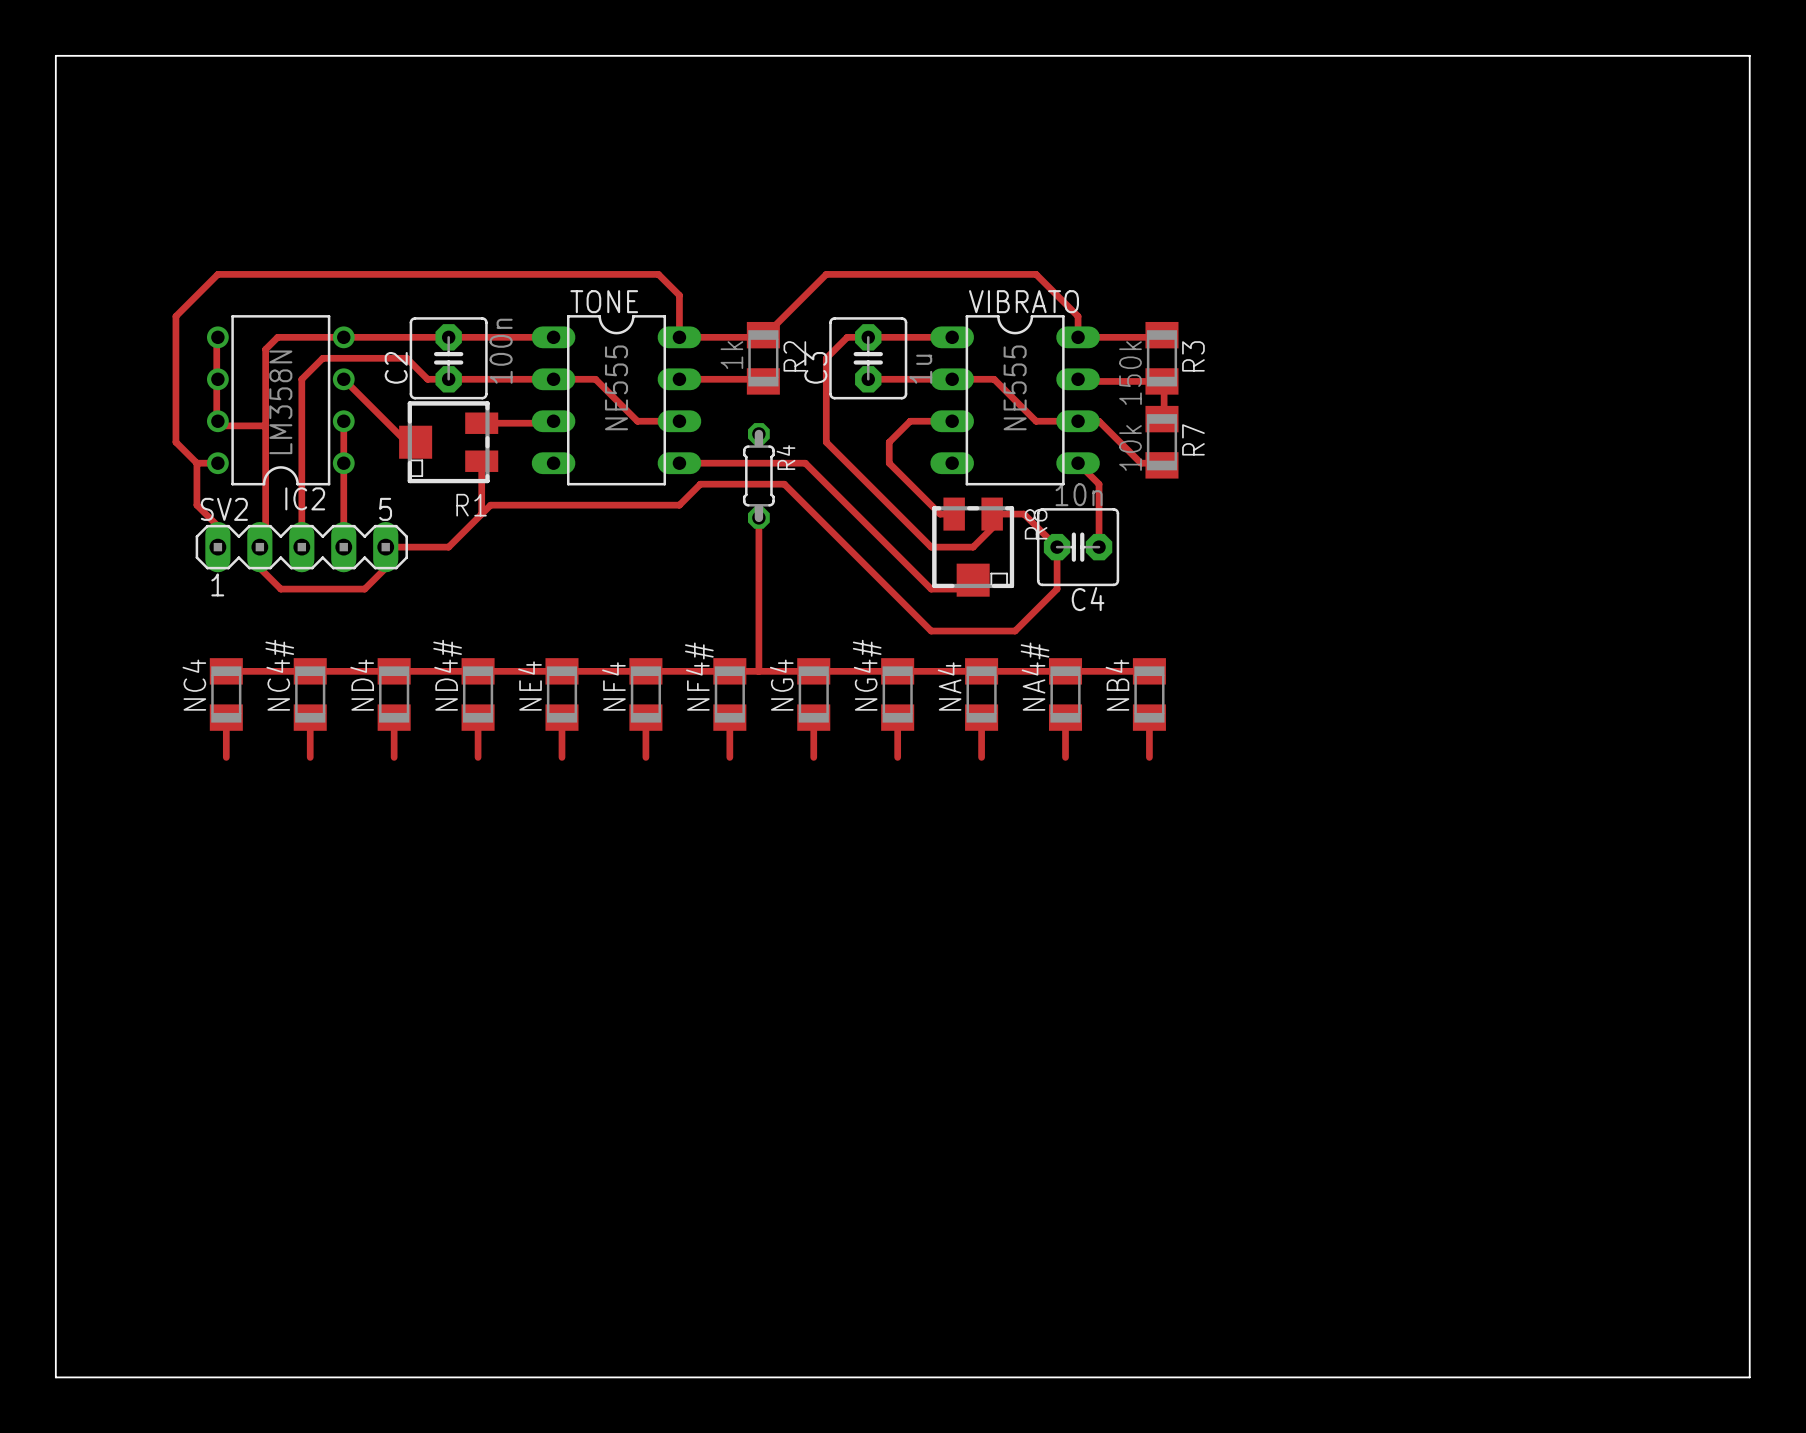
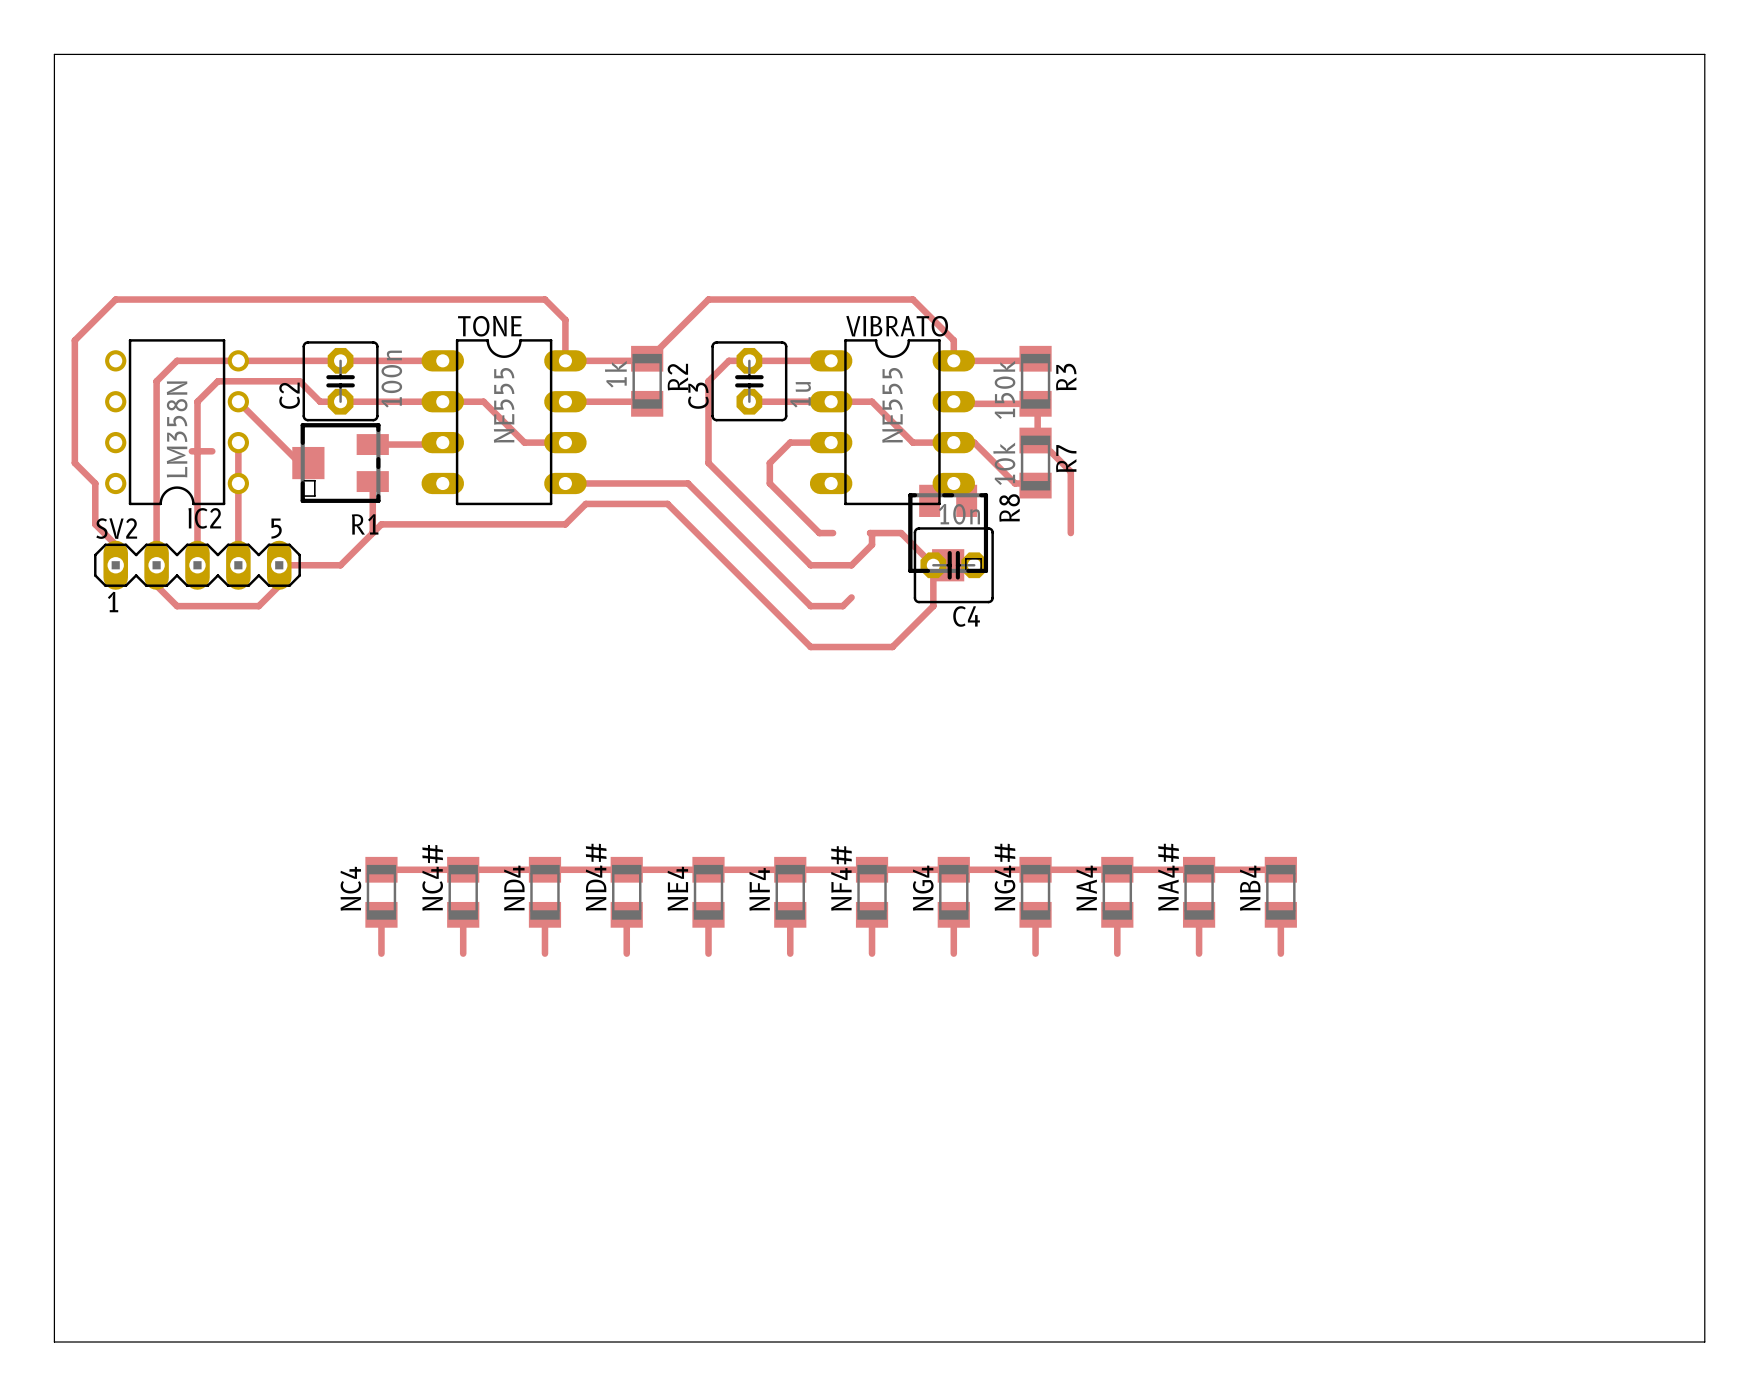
top track: (1161, 335) (1159, 337) (1078, 337) (1078, 316) (1036, 274) (826, 274) (763, 337) -> (1035, 358) (1033, 360) (953, 360) (953, 340) (912, 299) (708, 299) (647, 360)
top track: (553, 337) (277, 337) (265, 349) (265, 559) -> none
top track: (763, 337) (679, 337) (679, 295) (658, 274) (217, 274) (175, 316) (175, 442) (196, 463) (196, 505) (217, 526) (217, 547) -> (647, 360) (565, 360) (565, 319) (544, 299) (115, 299) (74, 340) (74, 463) (95, 483) (95, 524) (115, 544) (115, 565)
top track: (952, 337) (847, 337) (826, 358) (826, 442) (931, 547) (973, 547) (994, 526) (994, 516) (992, 514) (1024, 514) (1057, 547) (1057, 589) (1015, 631) (931, 631) (784, 484) (700, 484) (679, 505) (490, 505) (448, 547) (385, 547) (385, 568) (364, 589) (280, 589) (259, 568) (259, 547) -> none
top track: (216, 339) (216, 425) (262, 425) -> none
C2 position: (448, 358) -> (340, 381)
R2 position: (763, 358) -> (647, 381)
C3 position: (868, 358) -> (749, 381)
R3 position: (1161, 358) -> (1035, 381)
top track: none -> (442, 360) (177, 360) (156, 381) (156, 585) (177, 606) (258, 606) (279, 585) (279, 565) (340, 565) (381, 524) (565, 524) (585, 503) (667, 503) (810, 647) (892, 647) (933, 606) (933, 565) (901, 533) (870, 533) (872, 535) (872, 544) (851, 565) (810, 565) (708, 463) (708, 381) (728, 360) (831, 360)
top track: (343, 379) (406, 442) (415, 442) -> (238, 401) (299, 463) (308, 463)
top track: (679, 379) (763, 379) (763, 381) -> (565, 401) (647, 401) (647, 403)
top track: (868, 379) (994, 379) (1036, 421) (1099, 421) (1141, 463) (1159, 463) (1161, 465) -> (749, 401) (872, 401) (912, 442) (974, 442) (1015, 483) (1033, 483) (1035, 485)
top track: (1078, 379) (1080, 381) (1161, 381) (1164, 379) (1164, 416) (1161, 419) -> (953, 401) (955, 403) (1035, 403) (1037, 401) (1037, 438) (1035, 440)
IC2 position: (280, 400) -> (177, 422)
TONE position: (616, 400) -> (504, 422)
VIBRATO position: (1015, 400) -> (892, 422)
top track: (343, 421) (343, 547) -> (238, 442) (238, 565)
top track: (553, 421) (551, 423) (481, 423) -> (442, 442) (440, 444) (372, 444)
top track: (658, 421) (637, 421) (595, 379) (427, 379) (406, 358) (322, 358) (301, 379) (301, 547) -> (544, 442) (524, 442) (483, 401) (320, 401) (299, 381) (217, 381) (197, 401) (197, 565)
top track: (952, 421) (910, 421) (889, 442) (889, 463) (940, 514) (954, 514) -> (831, 442) (790, 442) (769, 463) (769, 483) (819, 533) (833, 533)
R1 position: (448, 442) -> (340, 463)
R7 position: (1161, 442) -> (1035, 463)
top track: (481, 461) (481, 514) -> (372, 481) (372, 533)
top track: (679, 463) (805, 463) (931, 589) (964, 589) (973, 580) -> (565, 483) (688, 483) (810, 606) (842, 606) (851, 597)
R4: (758, 475) -> none
top track: (758, 517) (758, 671) -> none
SV2 position: (301, 547) -> (197, 565)
C4 position: (1078, 547) -> (953, 565)
top track: (226, 671) (559, 671) (561, 673) (561, 671) (1149, 671) -> (381, 869) (706, 869) (708, 871) (708, 869) (1280, 869)
NC4 position: (226, 694) -> (381, 892)
NC4# position: (310, 694) -> (463, 892)
ND4 position: (394, 694) -> (544, 892)
ND4# position: (478, 694) -> (626, 892)
NE4 position: (561, 694) -> (708, 892)
NF4 position: (645, 694) -> (790, 892)
NF4# position: (729, 694) -> (872, 892)
NG4 position: (813, 694) -> (953, 892)
NG4# position: (897, 694) -> (1035, 892)
NA4 position: (981, 694) -> (1117, 892)
NA4# position: (1065, 694) -> (1199, 892)
NB4 position: (1149, 694) -> (1280, 892)
top track: (226, 715) (226, 757) -> (381, 912) (381, 953)
top track: (310, 715) (310, 757) -> (463, 912) (463, 953)
top track: (394, 715) (394, 757) -> (544, 912) (544, 953)
top track: (478, 715) (478, 757) -> (626, 912) (626, 953)
top track: (561, 715) (561, 757) -> (708, 912) (708, 953)
top track: (645, 715) (645, 757) -> (790, 912) (790, 953)
top track: (729, 715) (729, 757) -> (872, 912) (872, 953)
top track: (813, 715) (813, 757) -> (953, 912) (953, 953)
top track: (897, 715) (897, 757) -> (1035, 912) (1035, 953)
top track: (981, 715) (981, 757) -> (1117, 912) (1117, 953)
top track: (1065, 715) (1065, 757) -> (1199, 912) (1199, 953)
top track: (1149, 715) (1149, 757) -> (1280, 912) (1280, 953)

